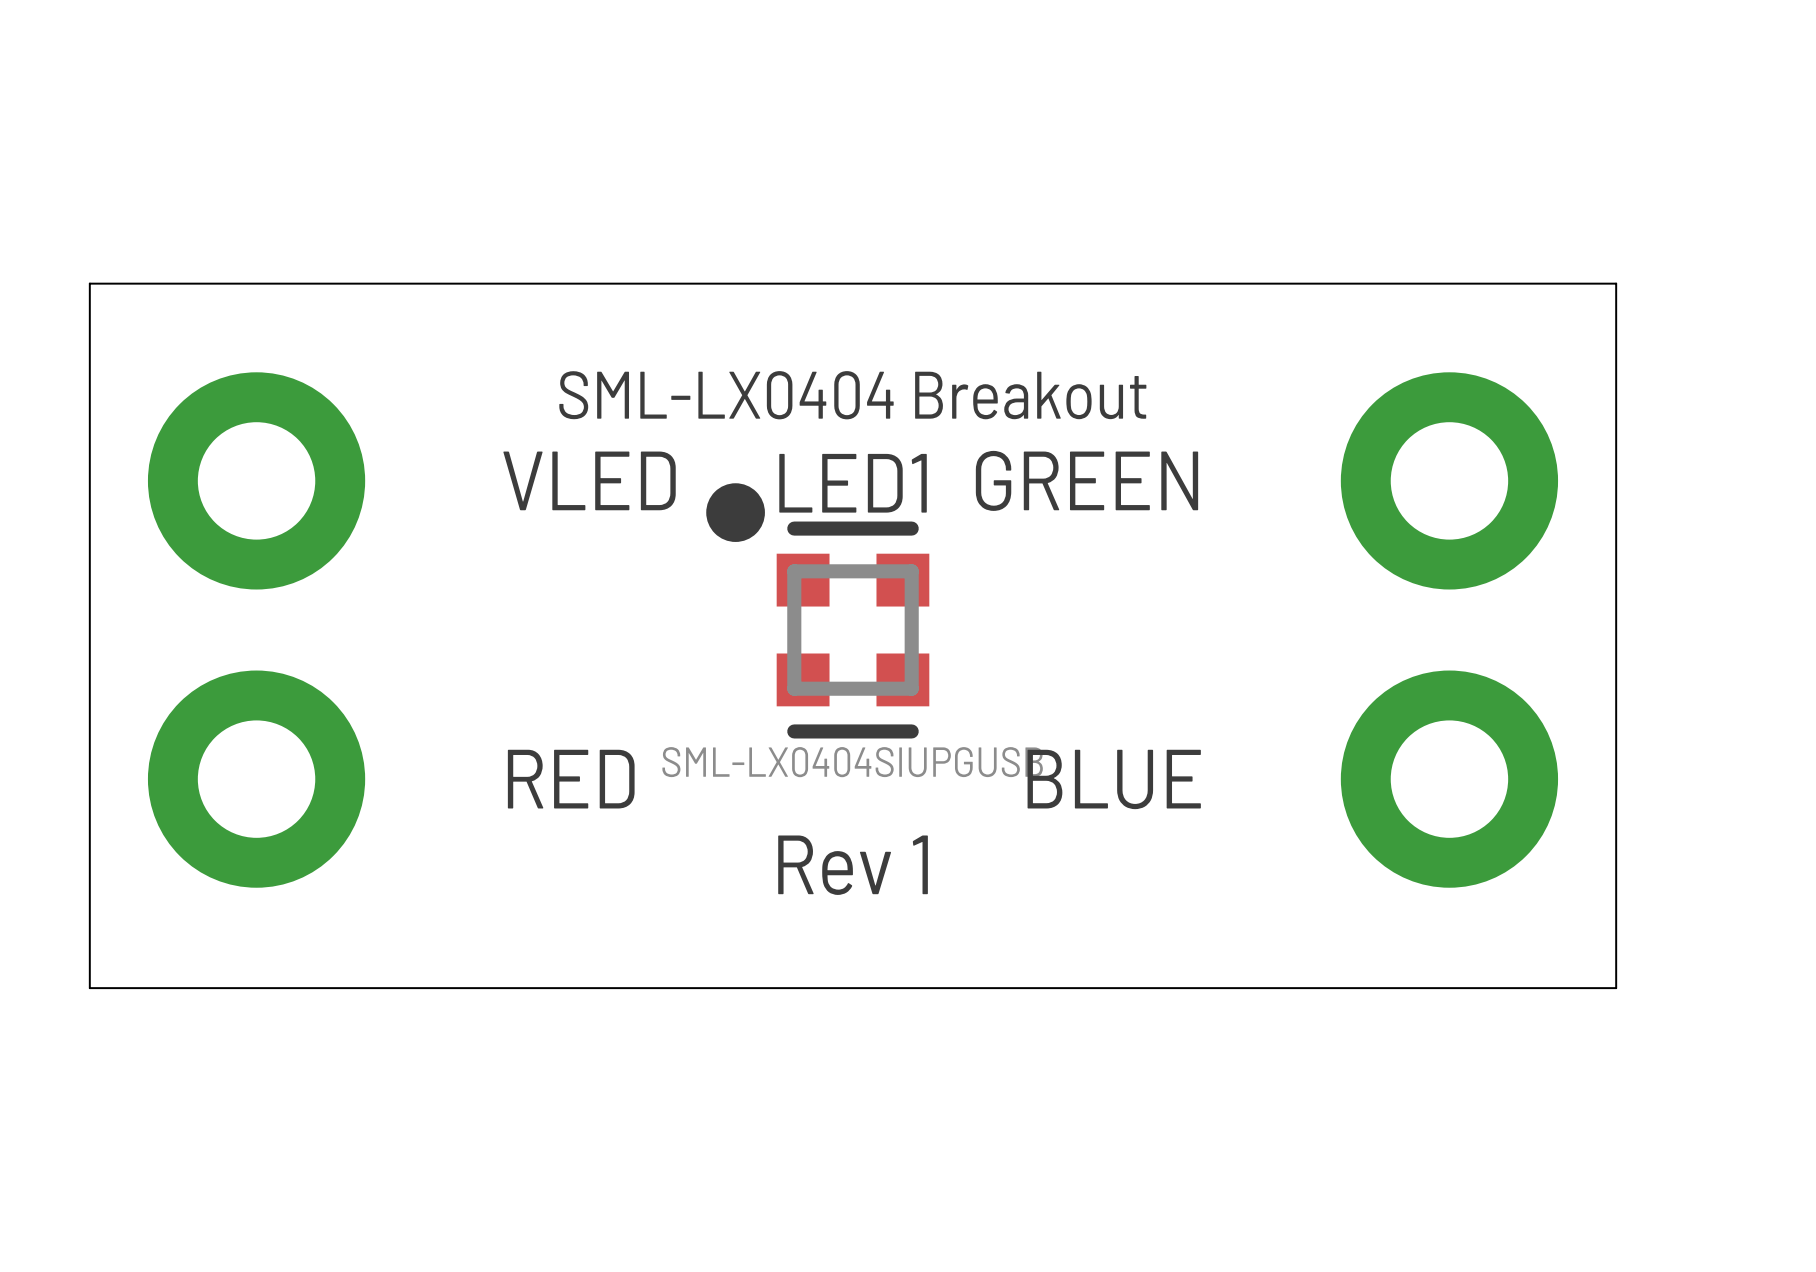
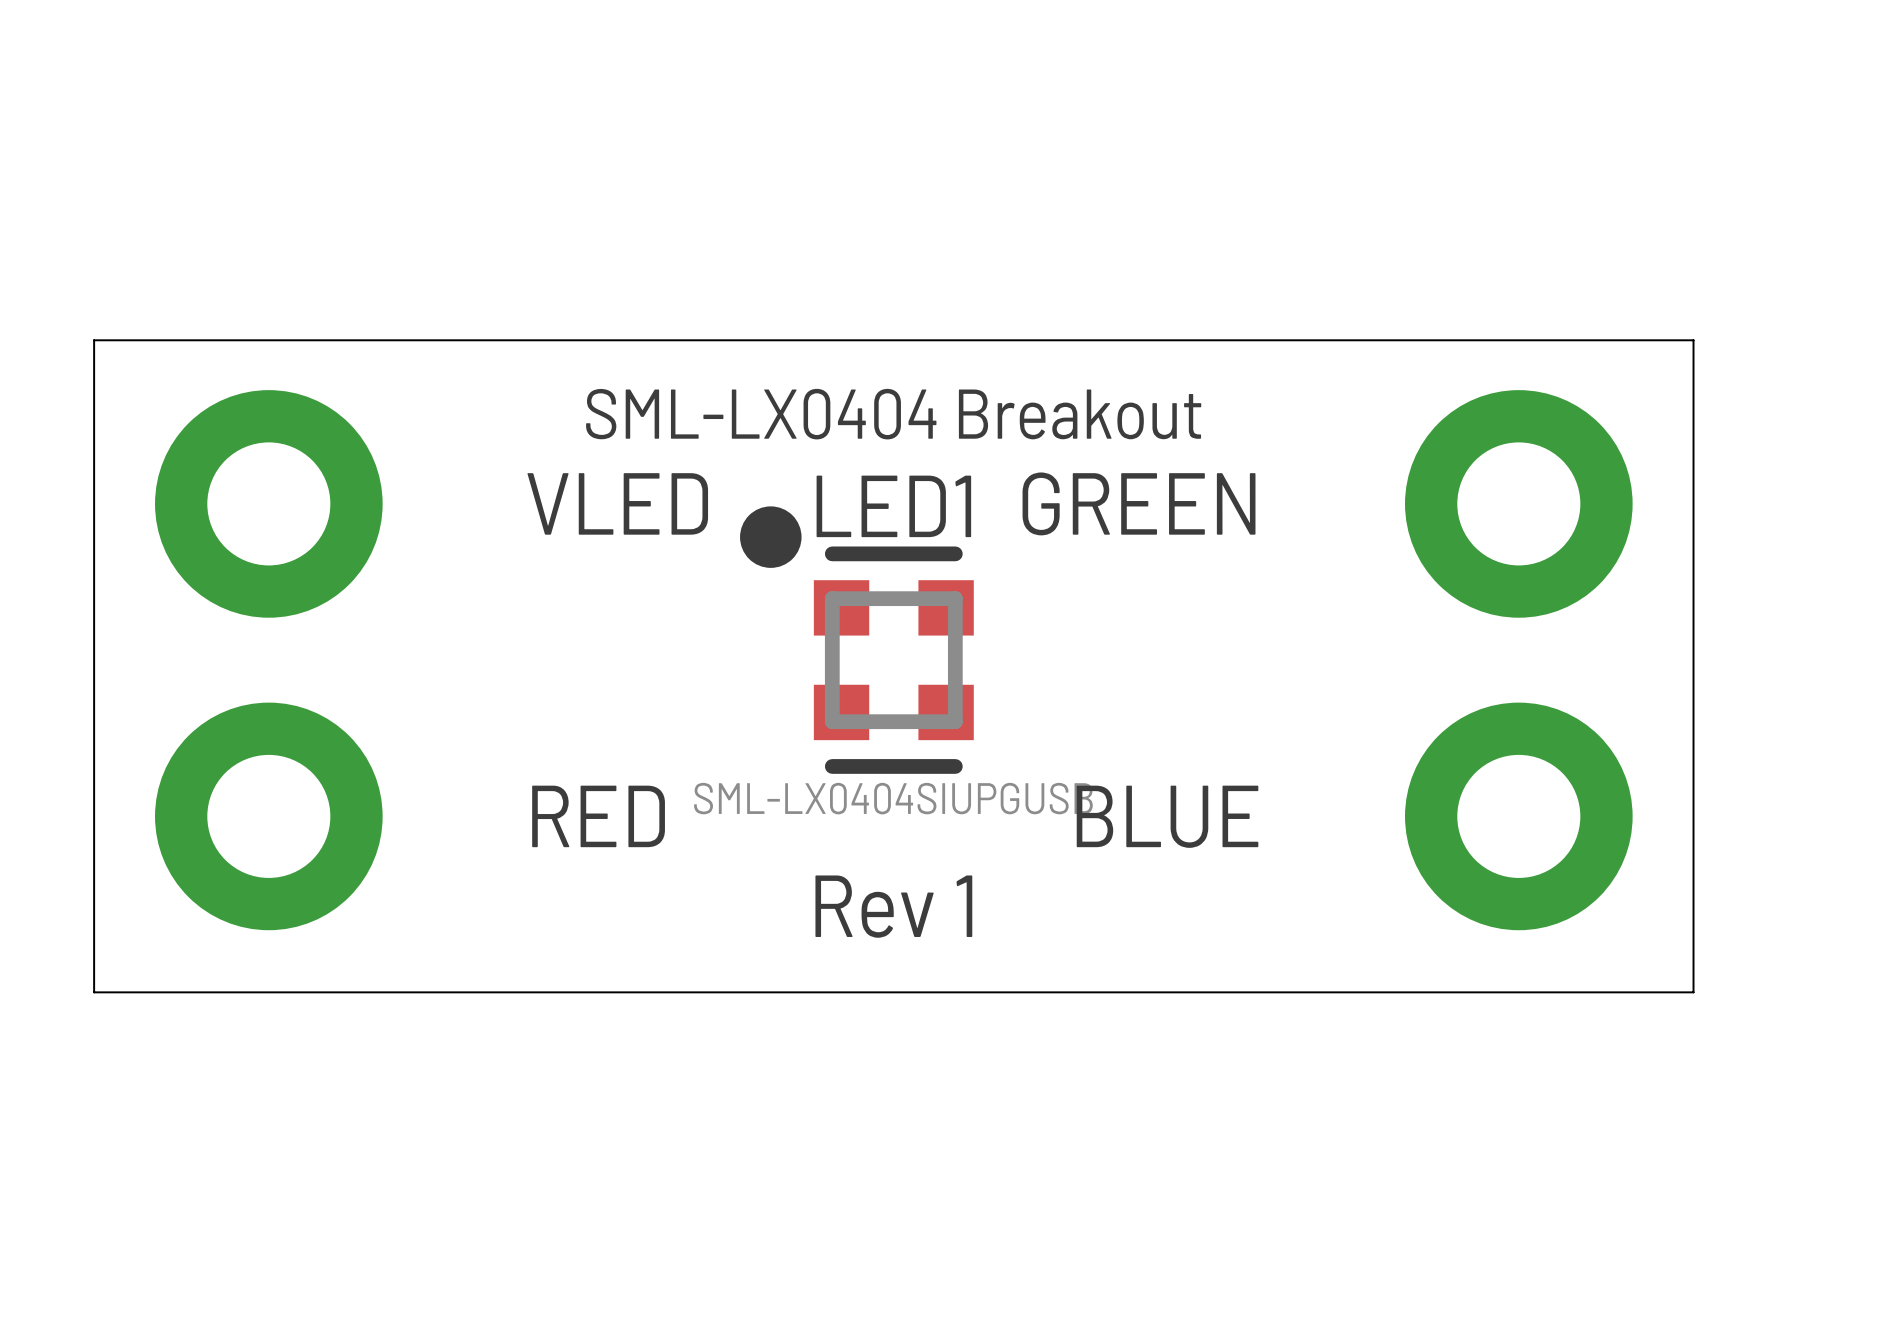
board edge: (89, 324) (89, 283) (1616, 283) (1616, 324) -> (94, 340) (1693, 340)
board edge: (89, 947) (89, 988) (1616, 988) (1616, 947) -> (94, 992) (1693, 992)

